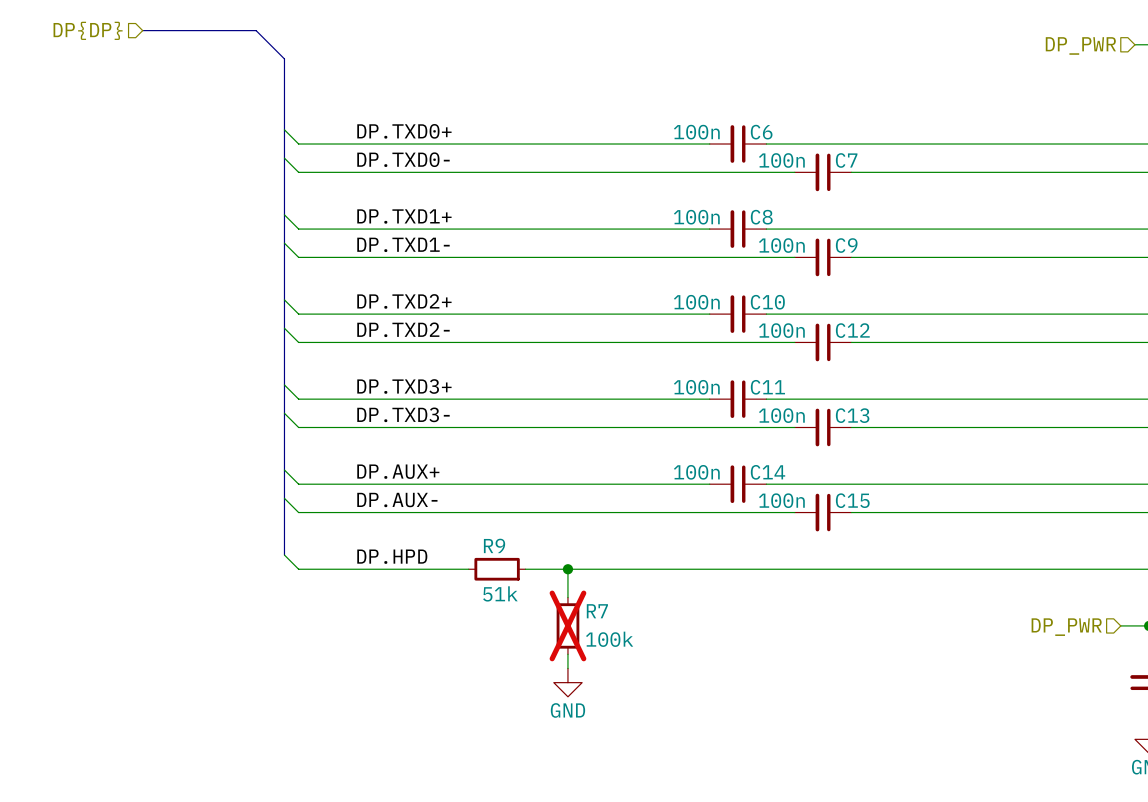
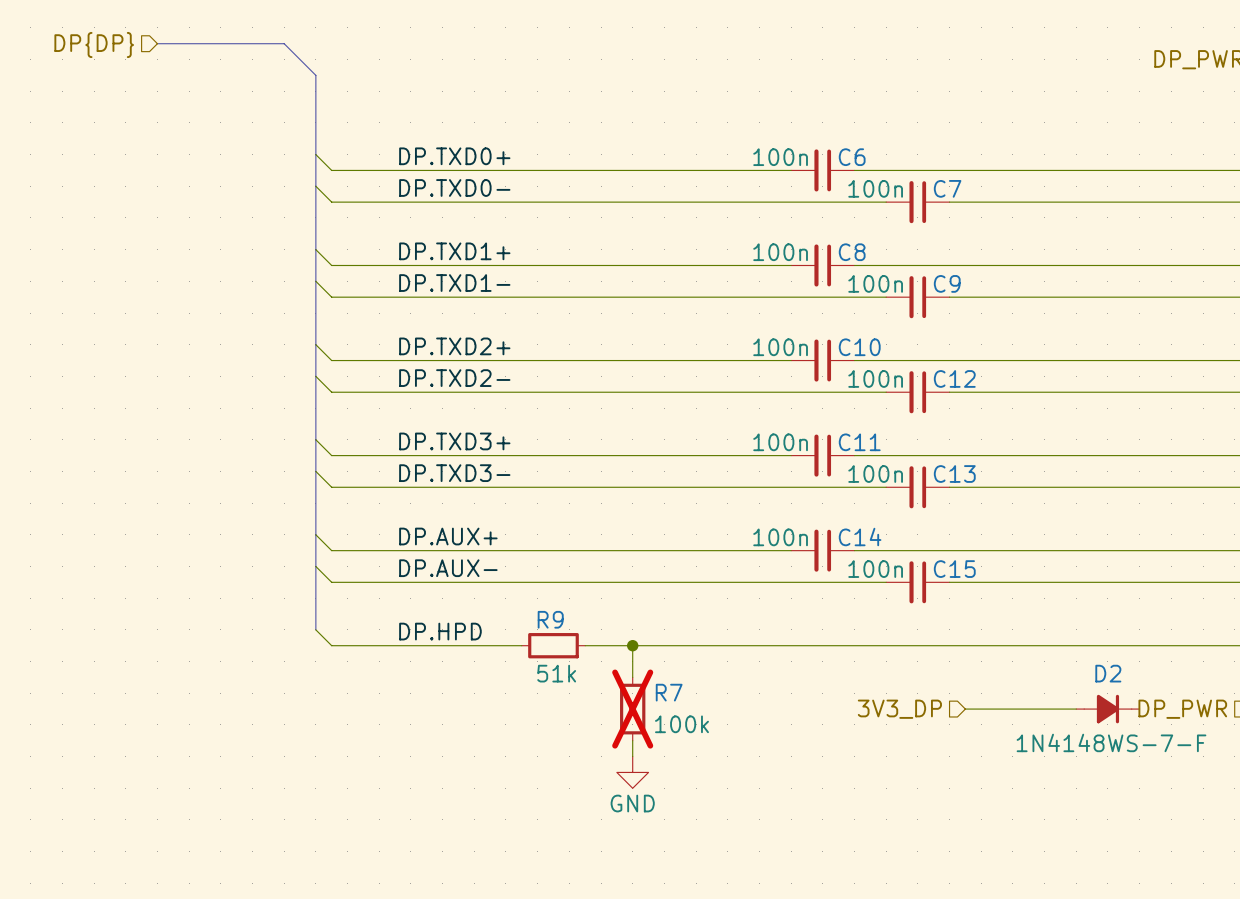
wire: none -> (965, 709) (1076, 709)
D2: none -> (1107, 709)
hierarchical label: none -> 3V3_DP (899, 709)

